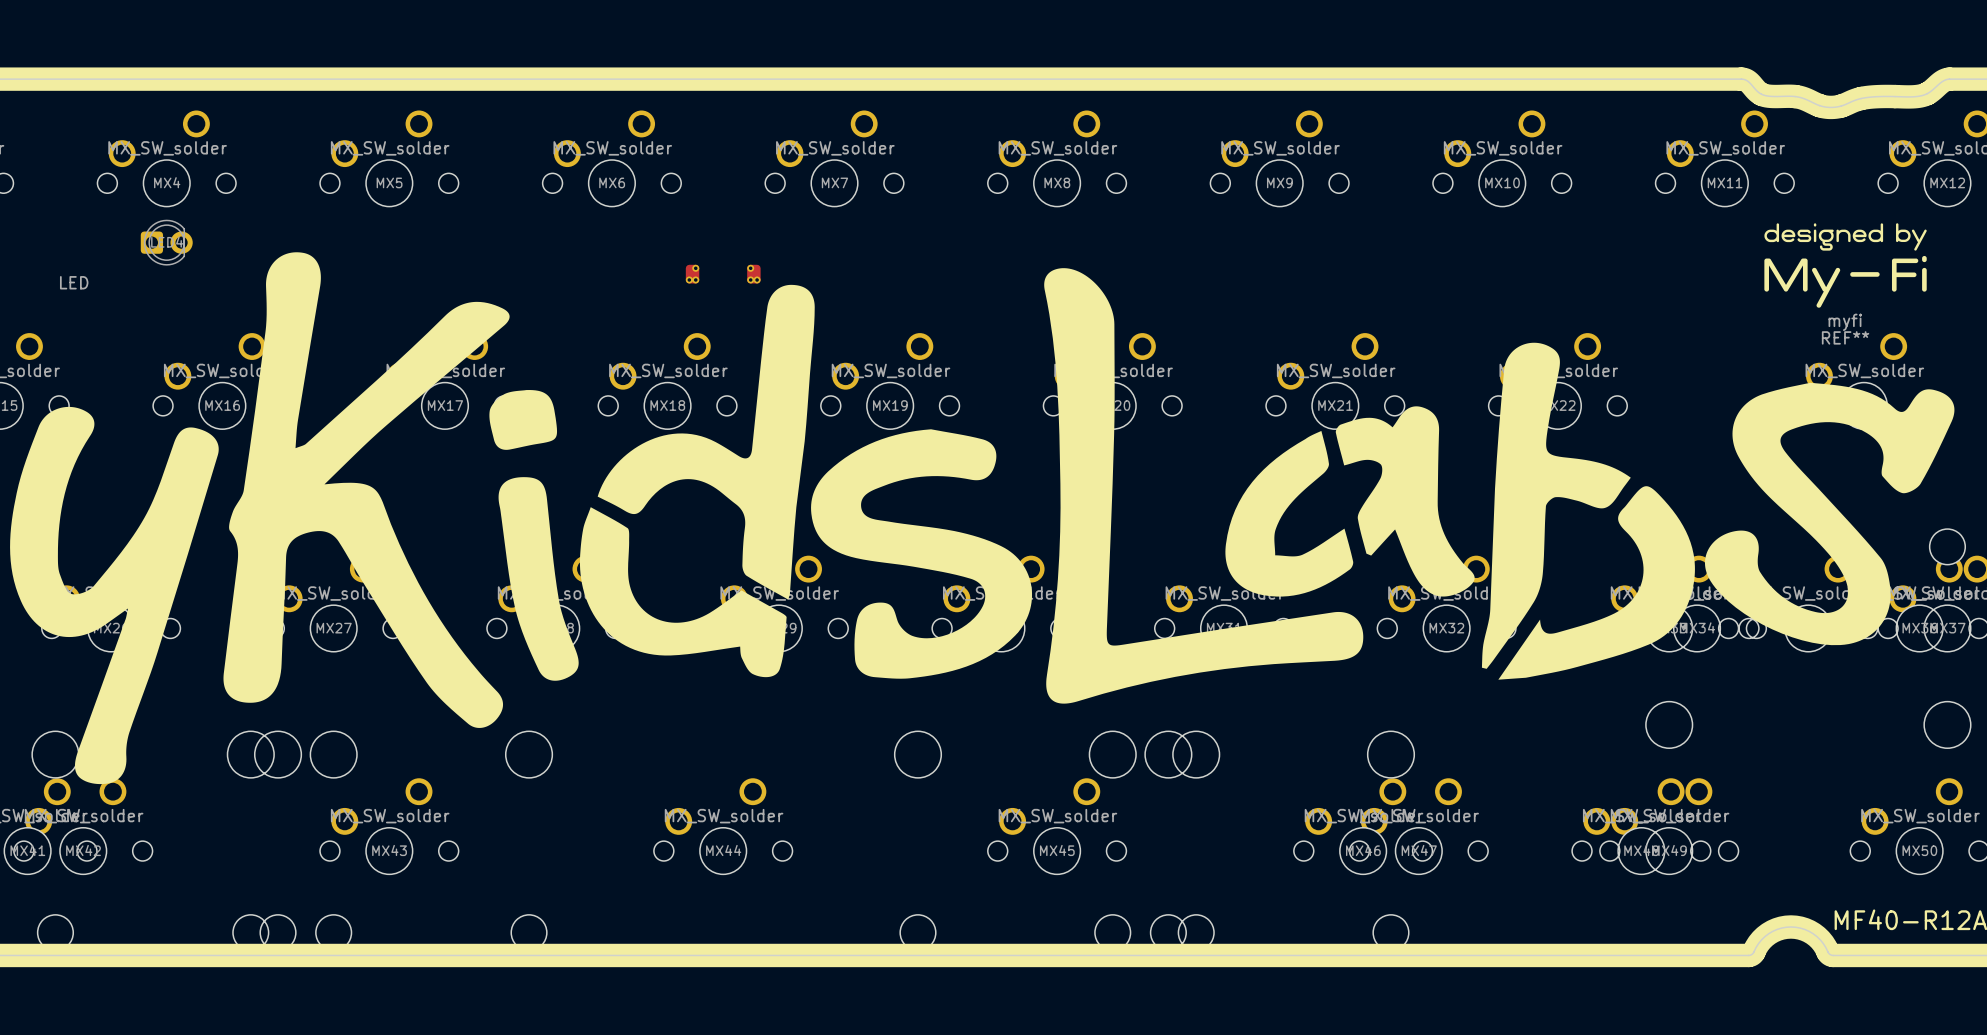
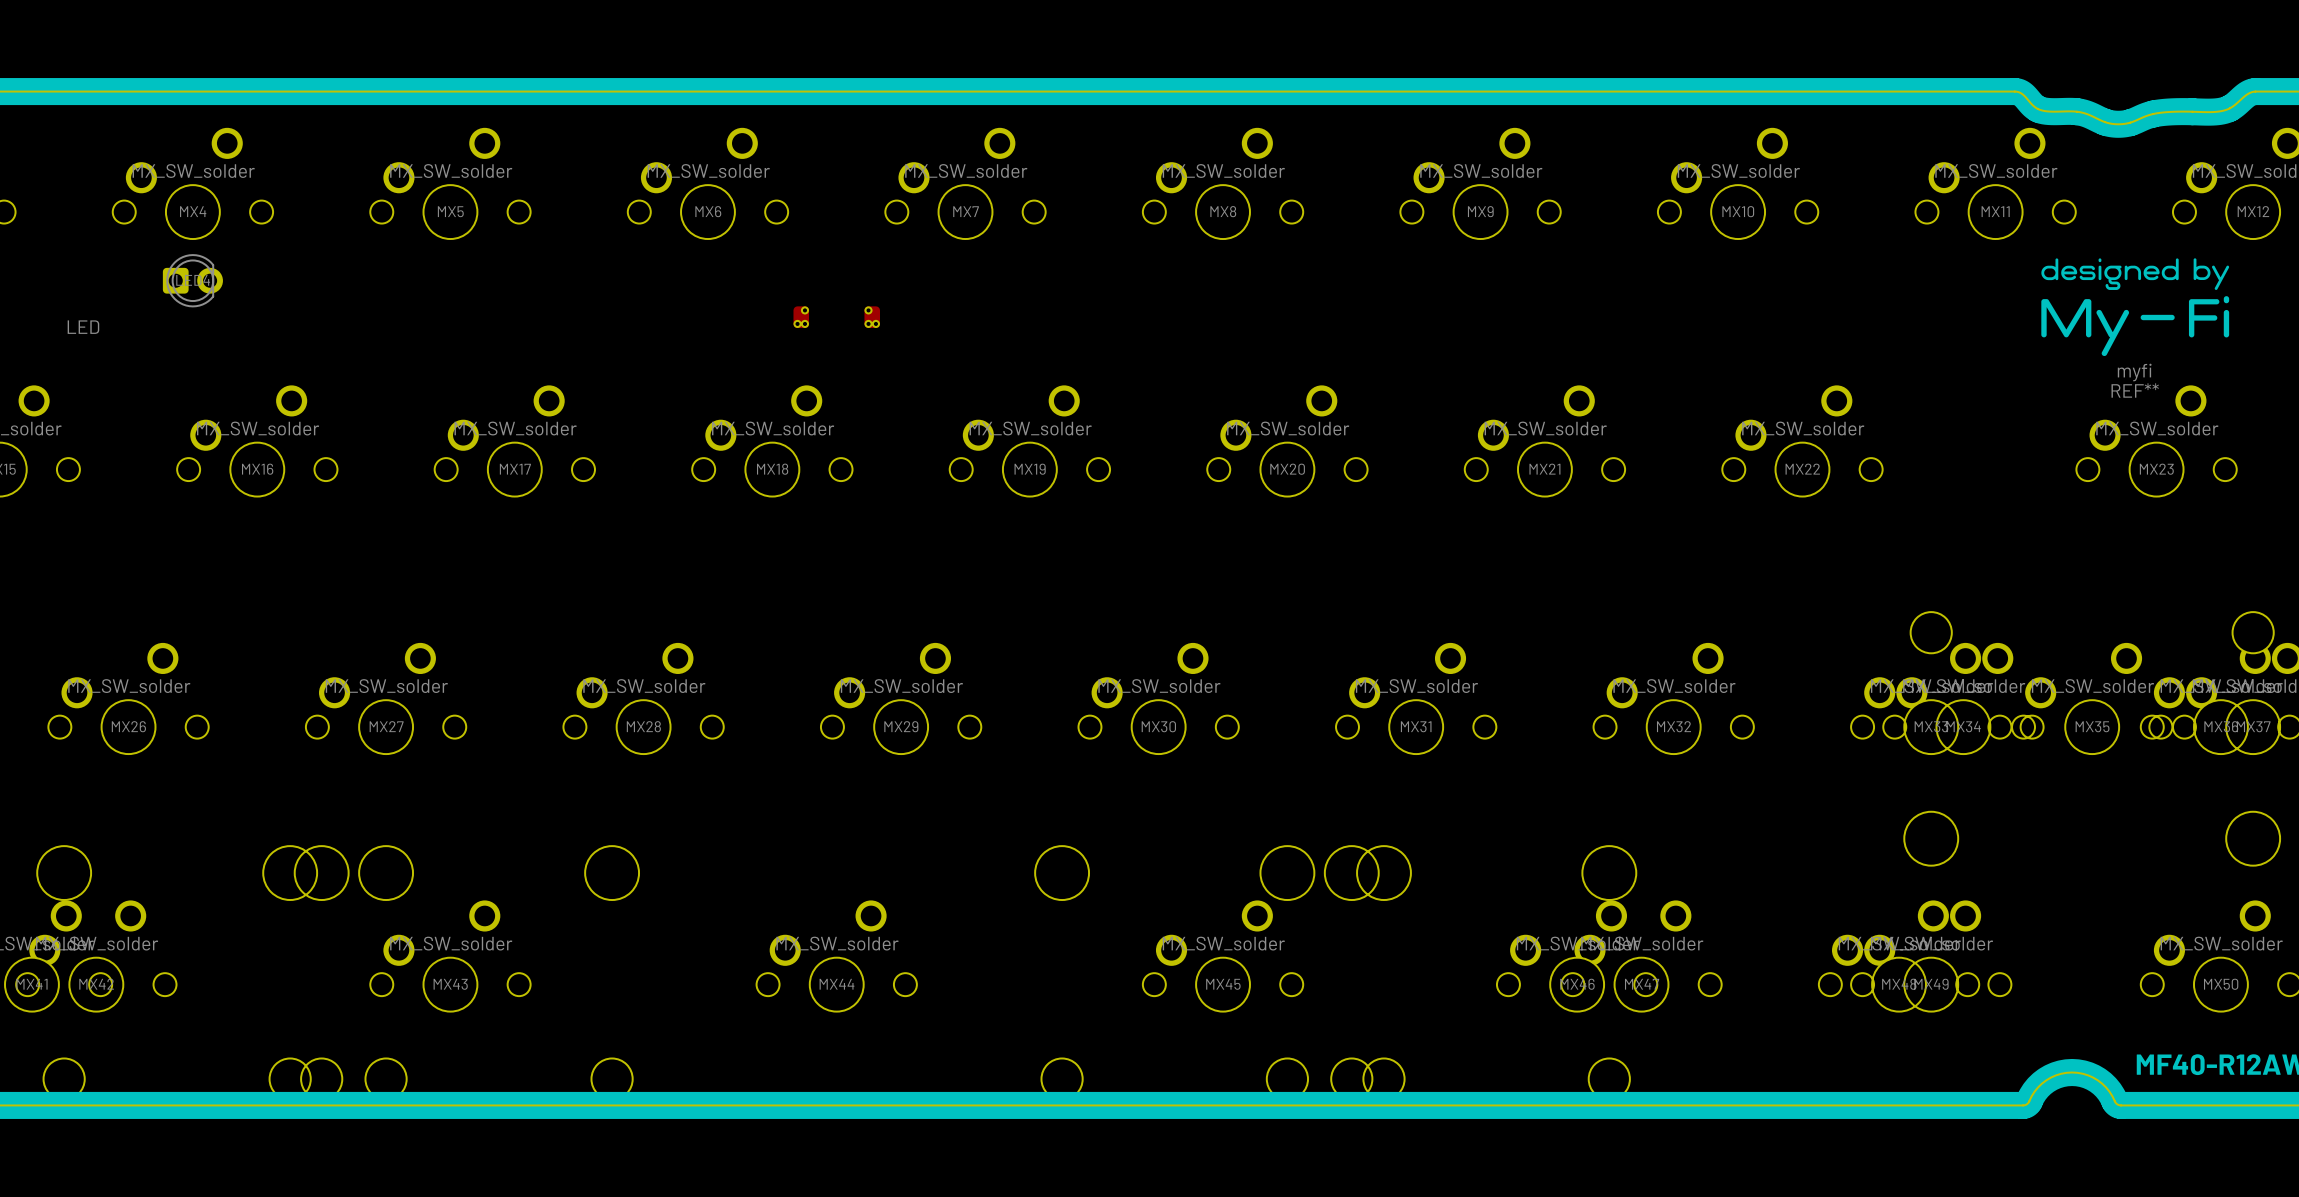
drawing: [10, 252, 1955, 785] -> none

